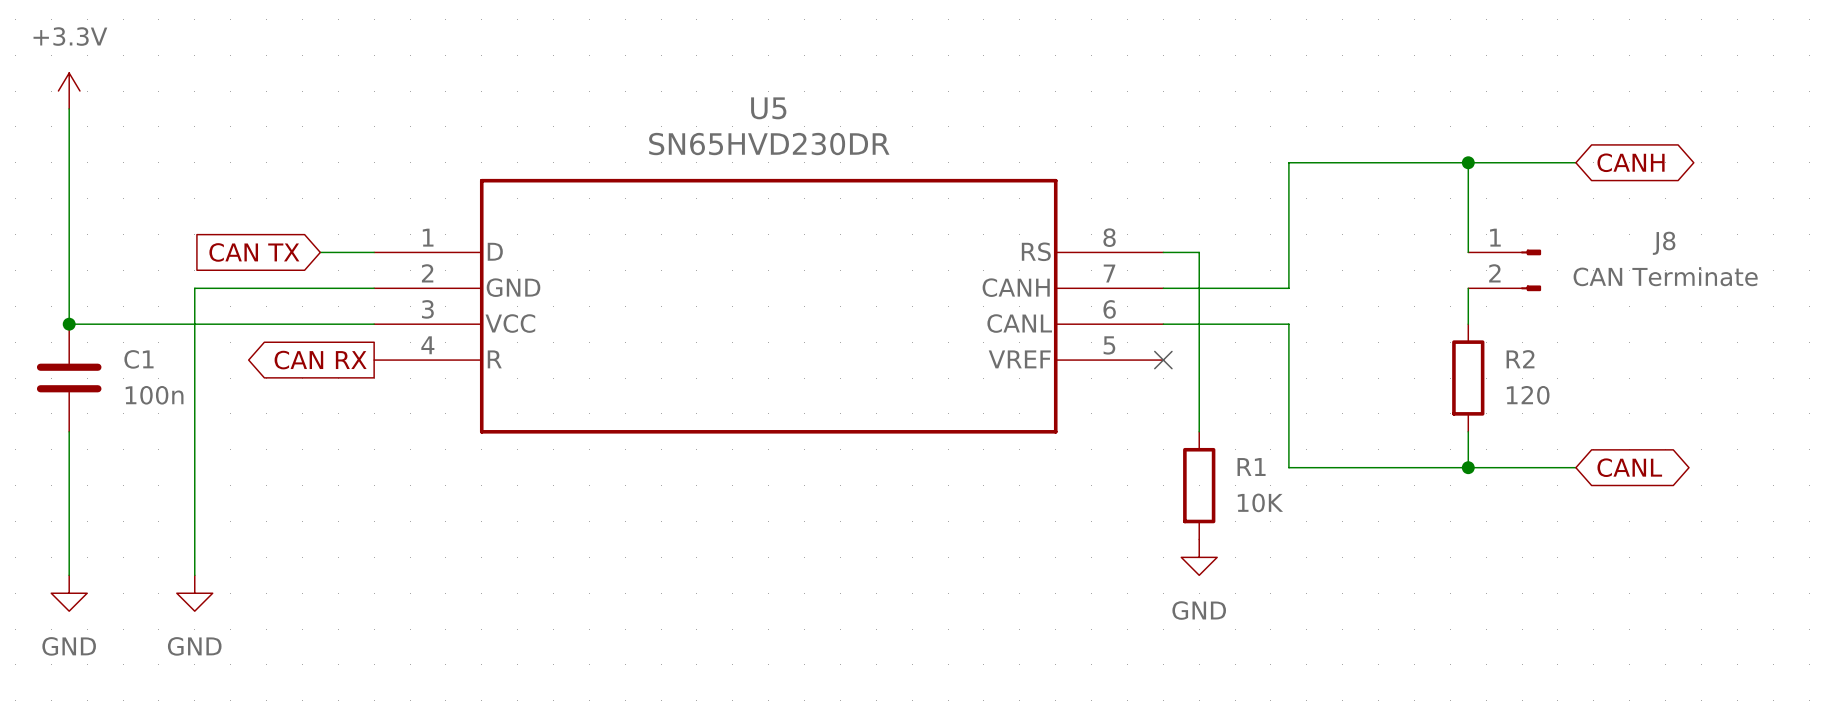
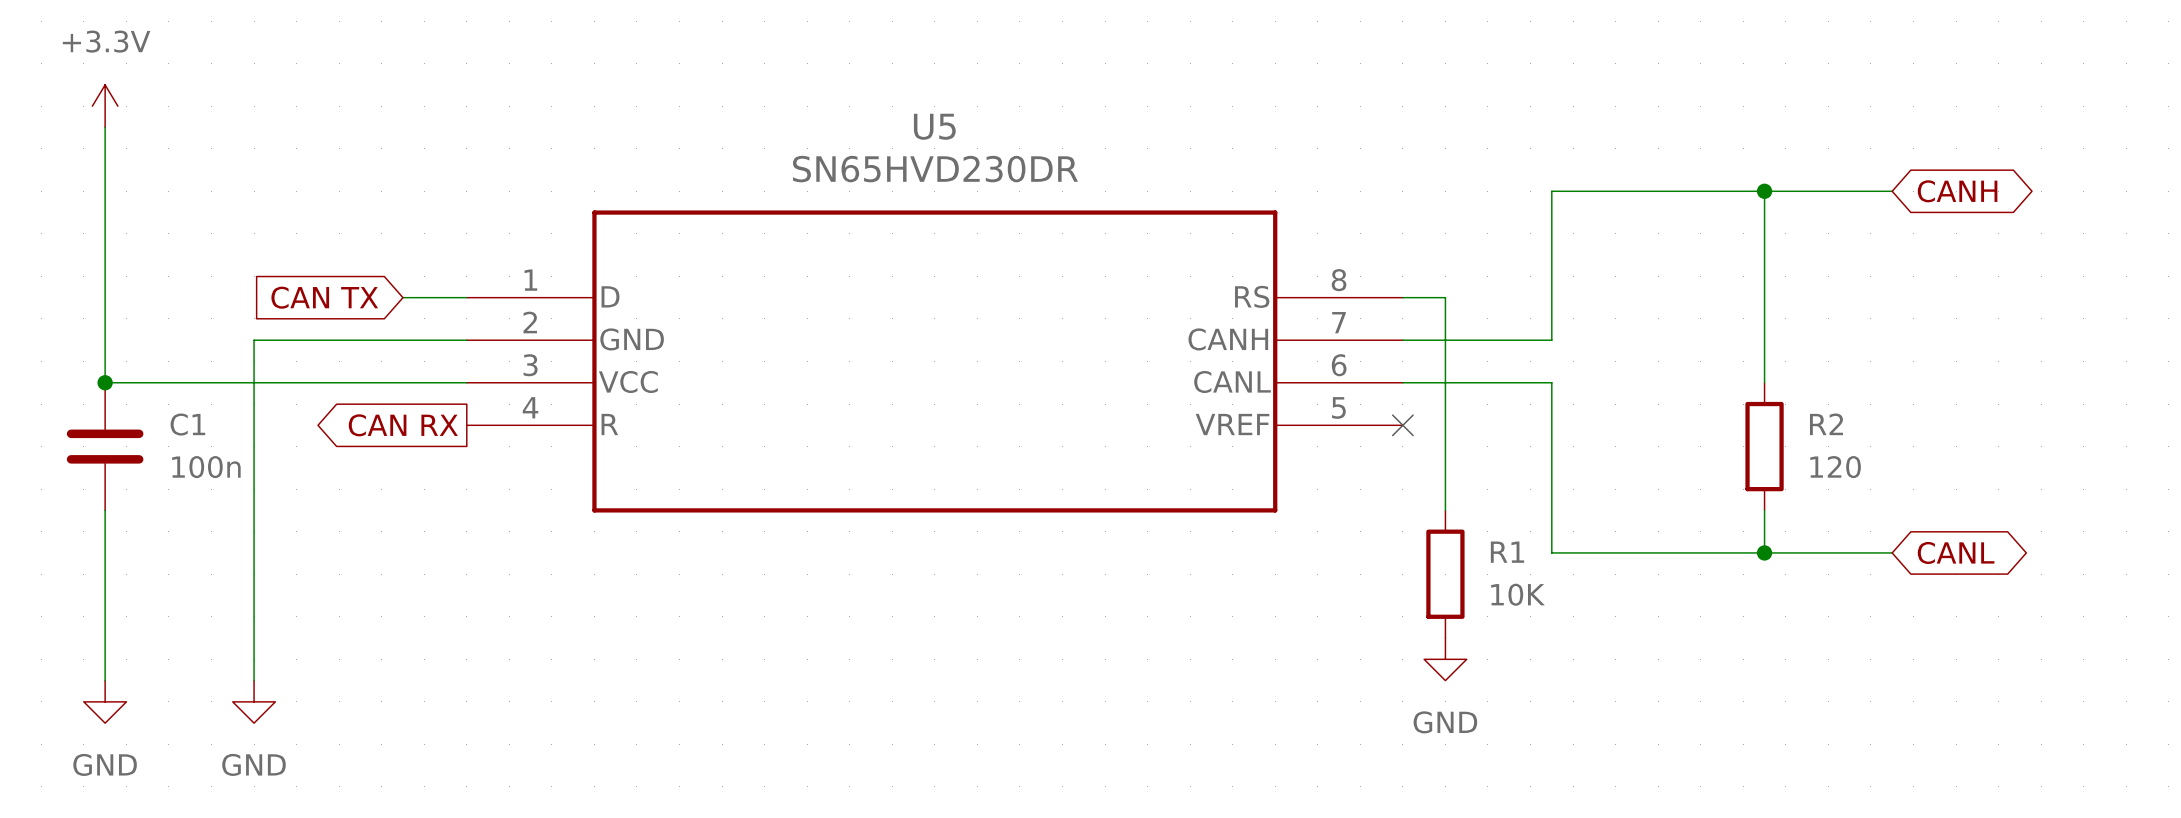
wire: none -> (1764, 297) (1764, 340)
J8: CAN Terminate (1504, 270) -> none

